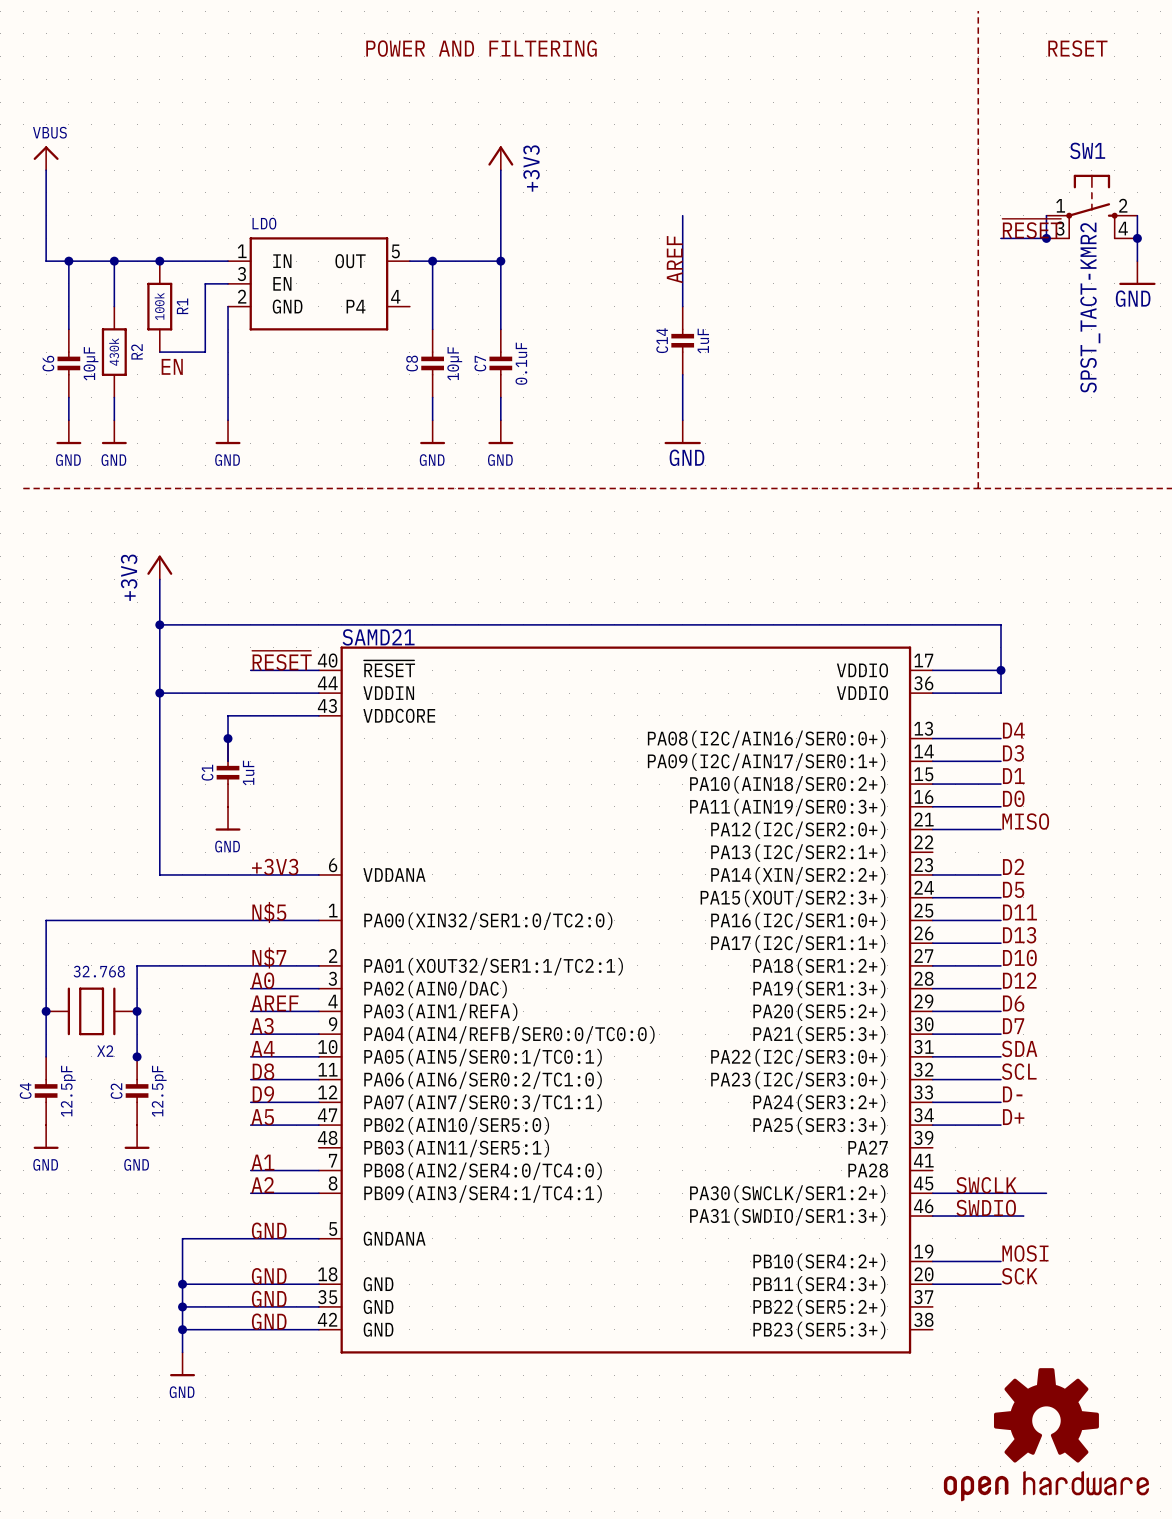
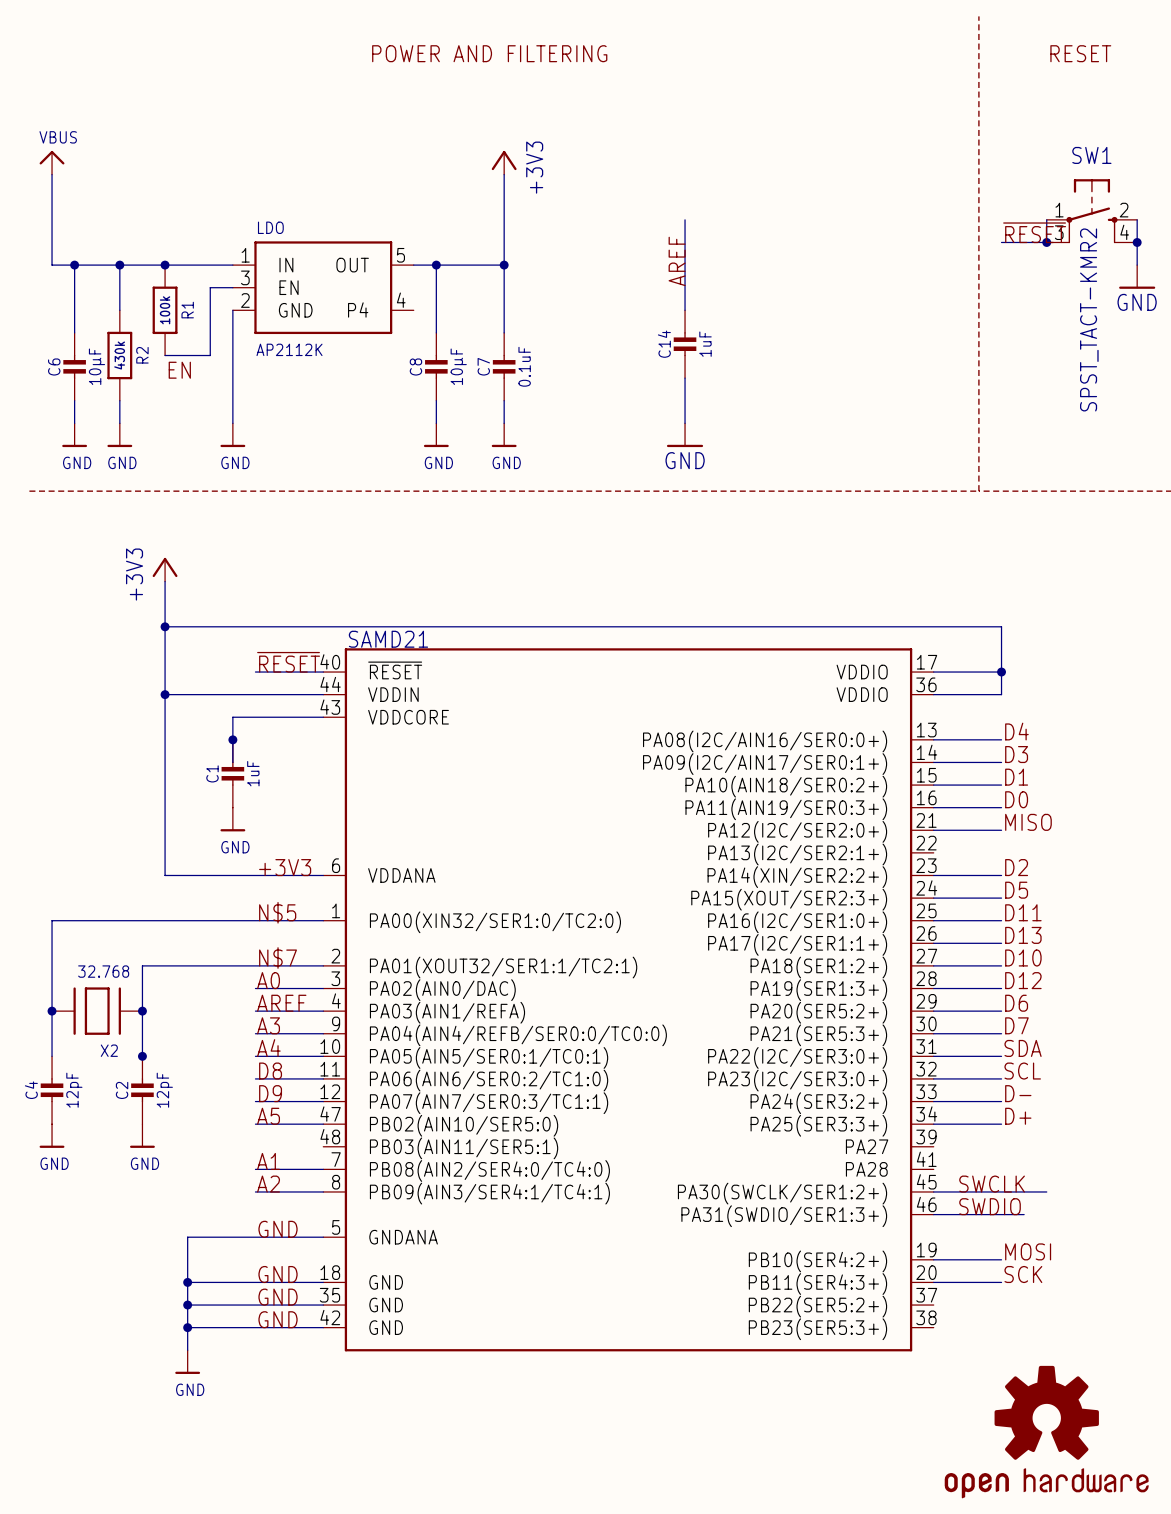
LDO value: none -> AP2112K (289, 349)
C4 value: 12.5pF (68, 1091) -> 12pF (74, 1090)
C2 value: 12.5pF (159, 1091) -> 12pF (164, 1090)

